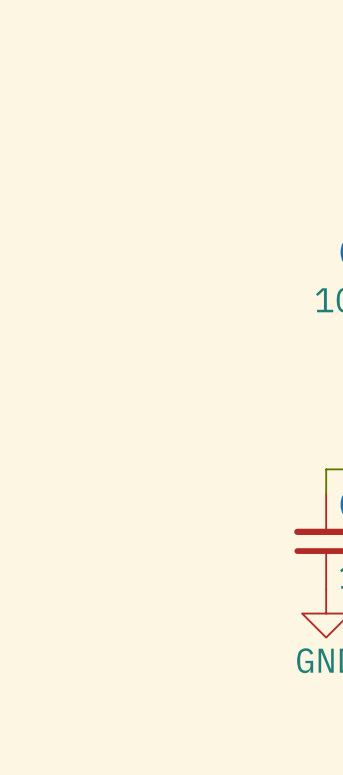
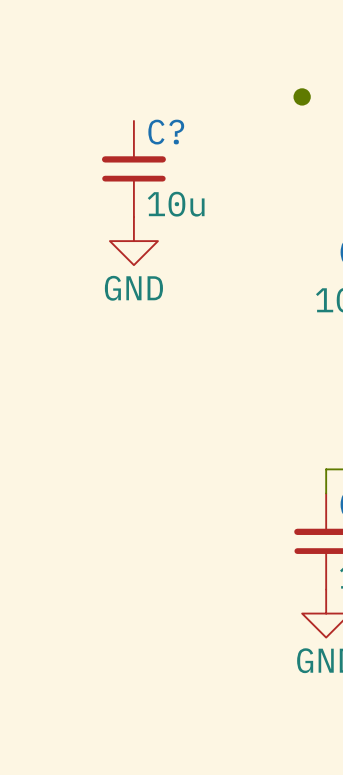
junction: none -> (302, 96)
C?: none -> (133, 169)
power symbol: none -> GND (133, 241)

